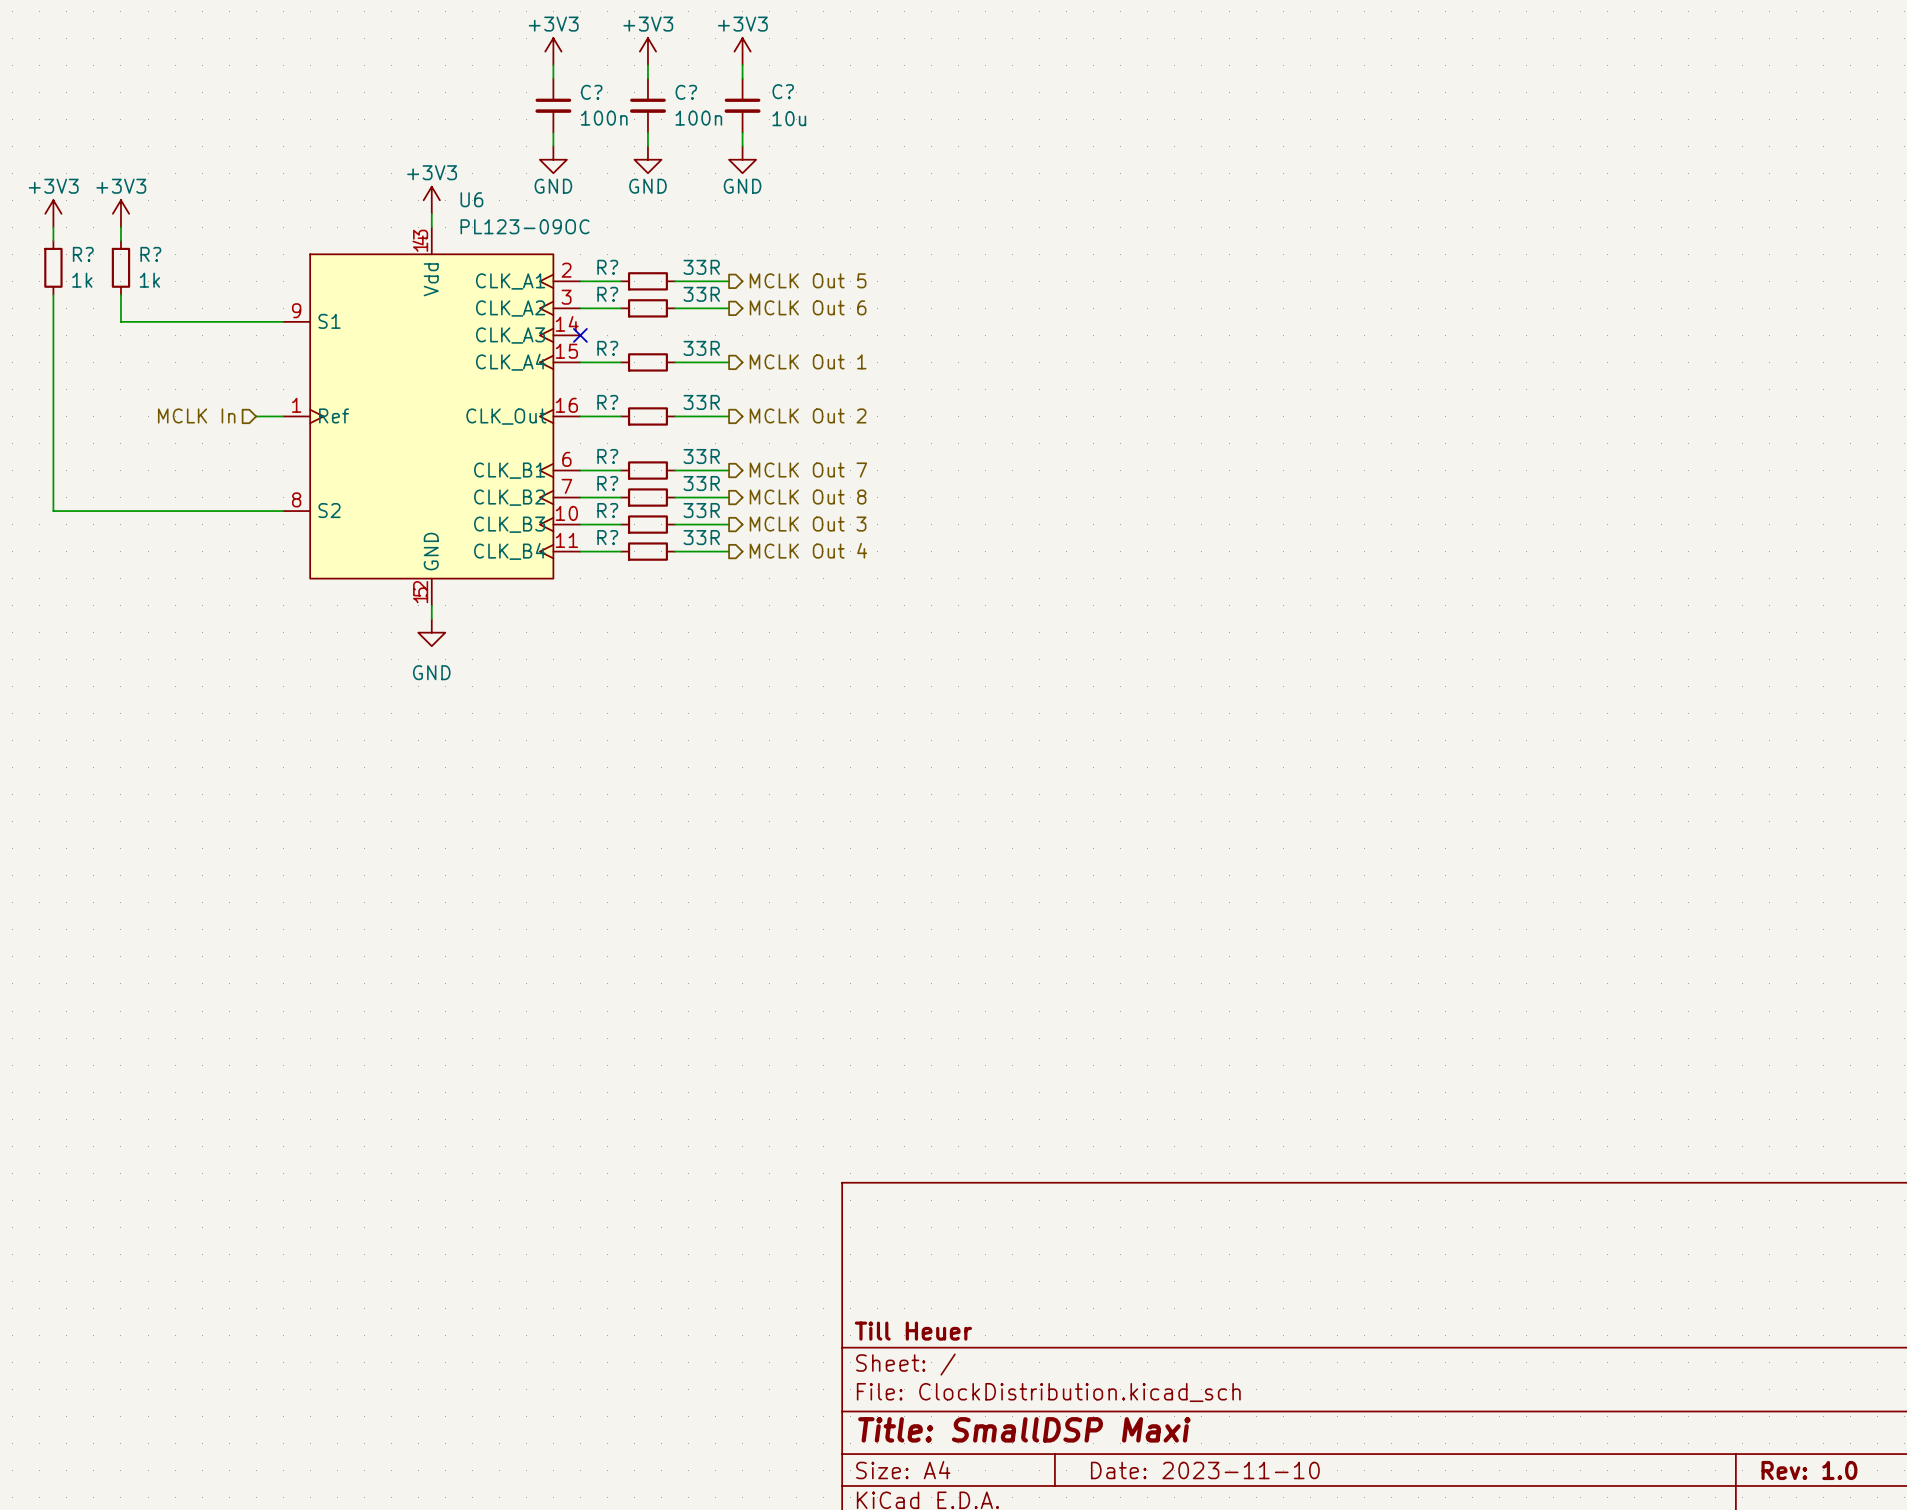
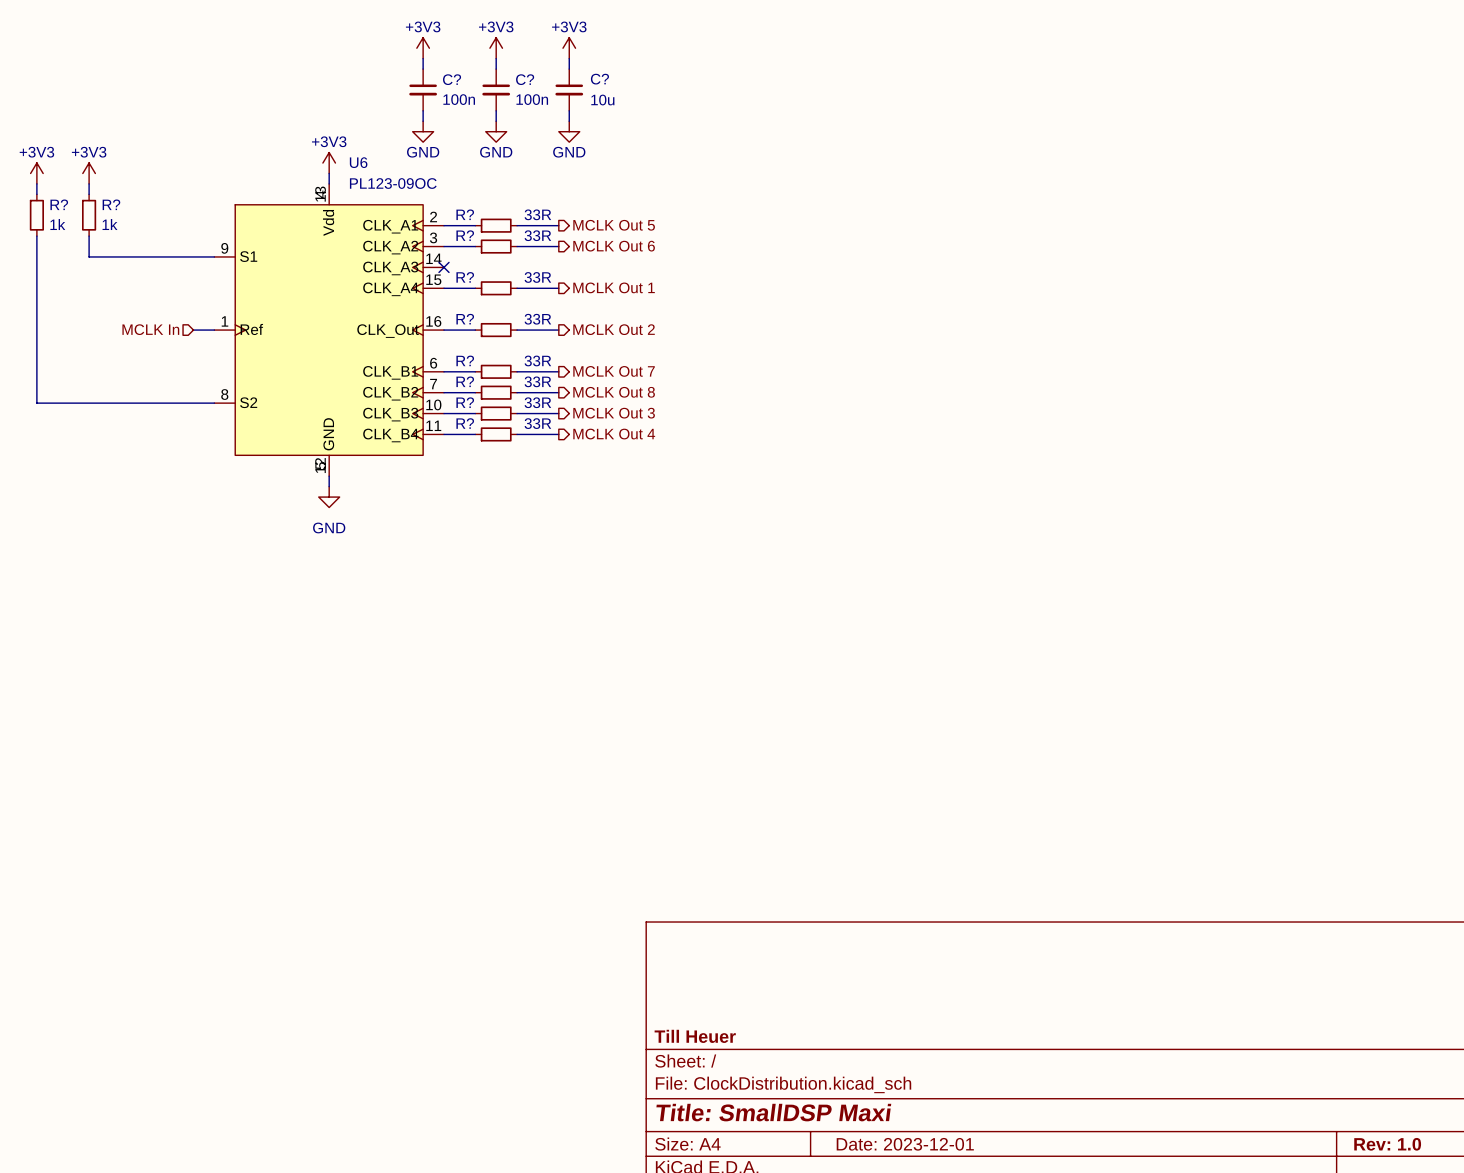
title block: Date: 2023-11-10 (1205, 1470) -> Date: 2023-12-01 (905, 1144)

